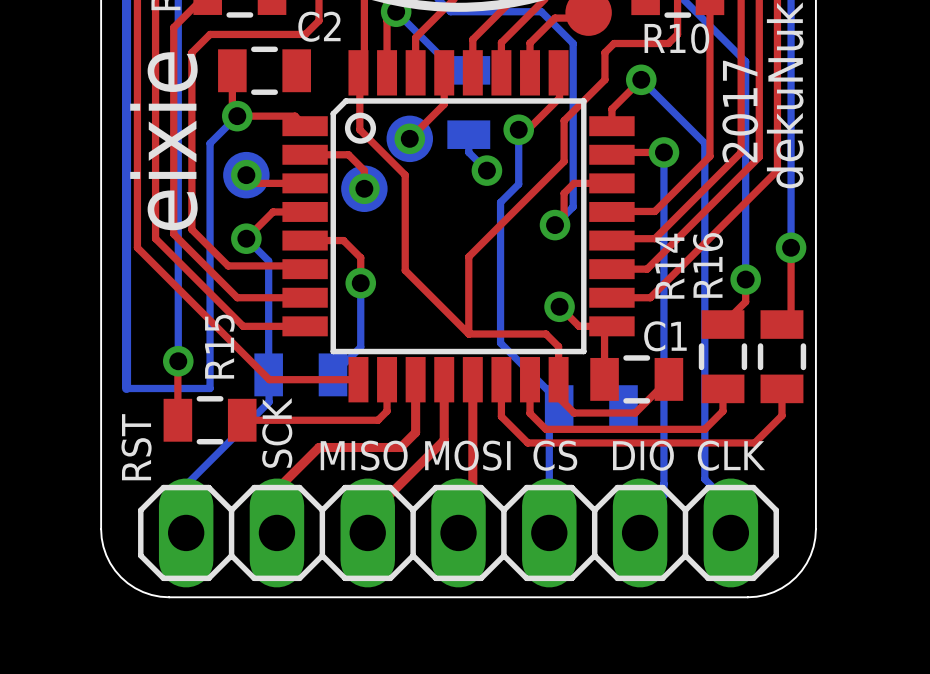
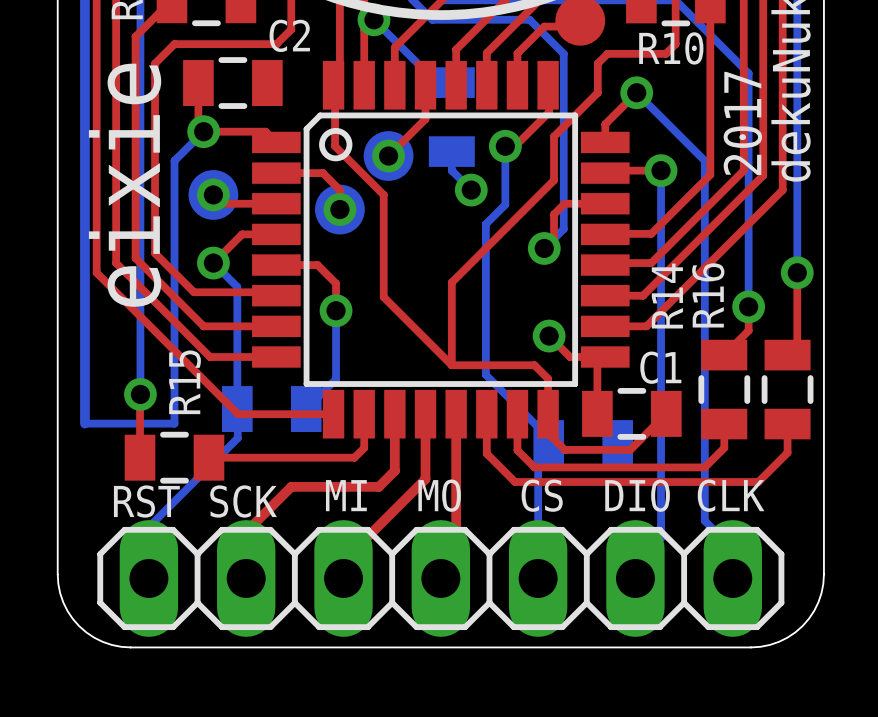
text rotation: 0° (277, 432) -> 90° clockwise (243, 501)
text rotation: 0° (136, 447) -> 90° clockwise (146, 501)
text: MISO (364, 455) -> MI (346, 495)
text: MOSI (467, 455) -> MO (439, 495)

